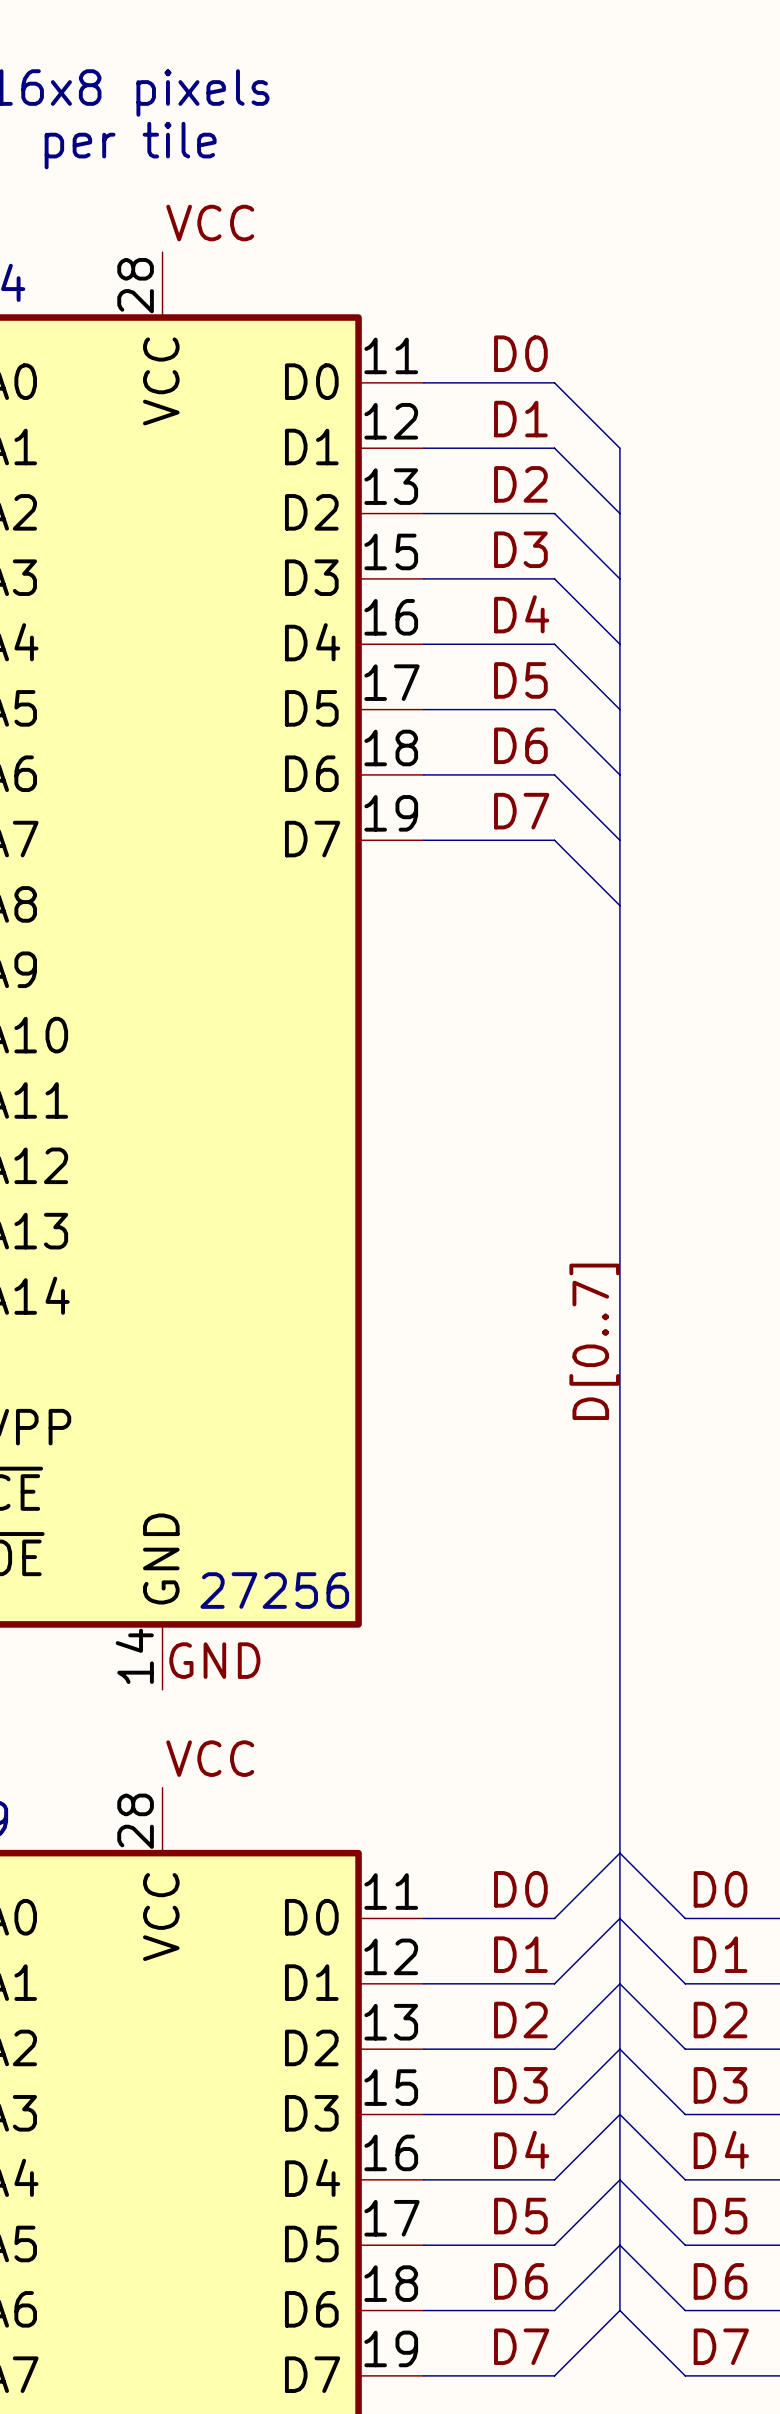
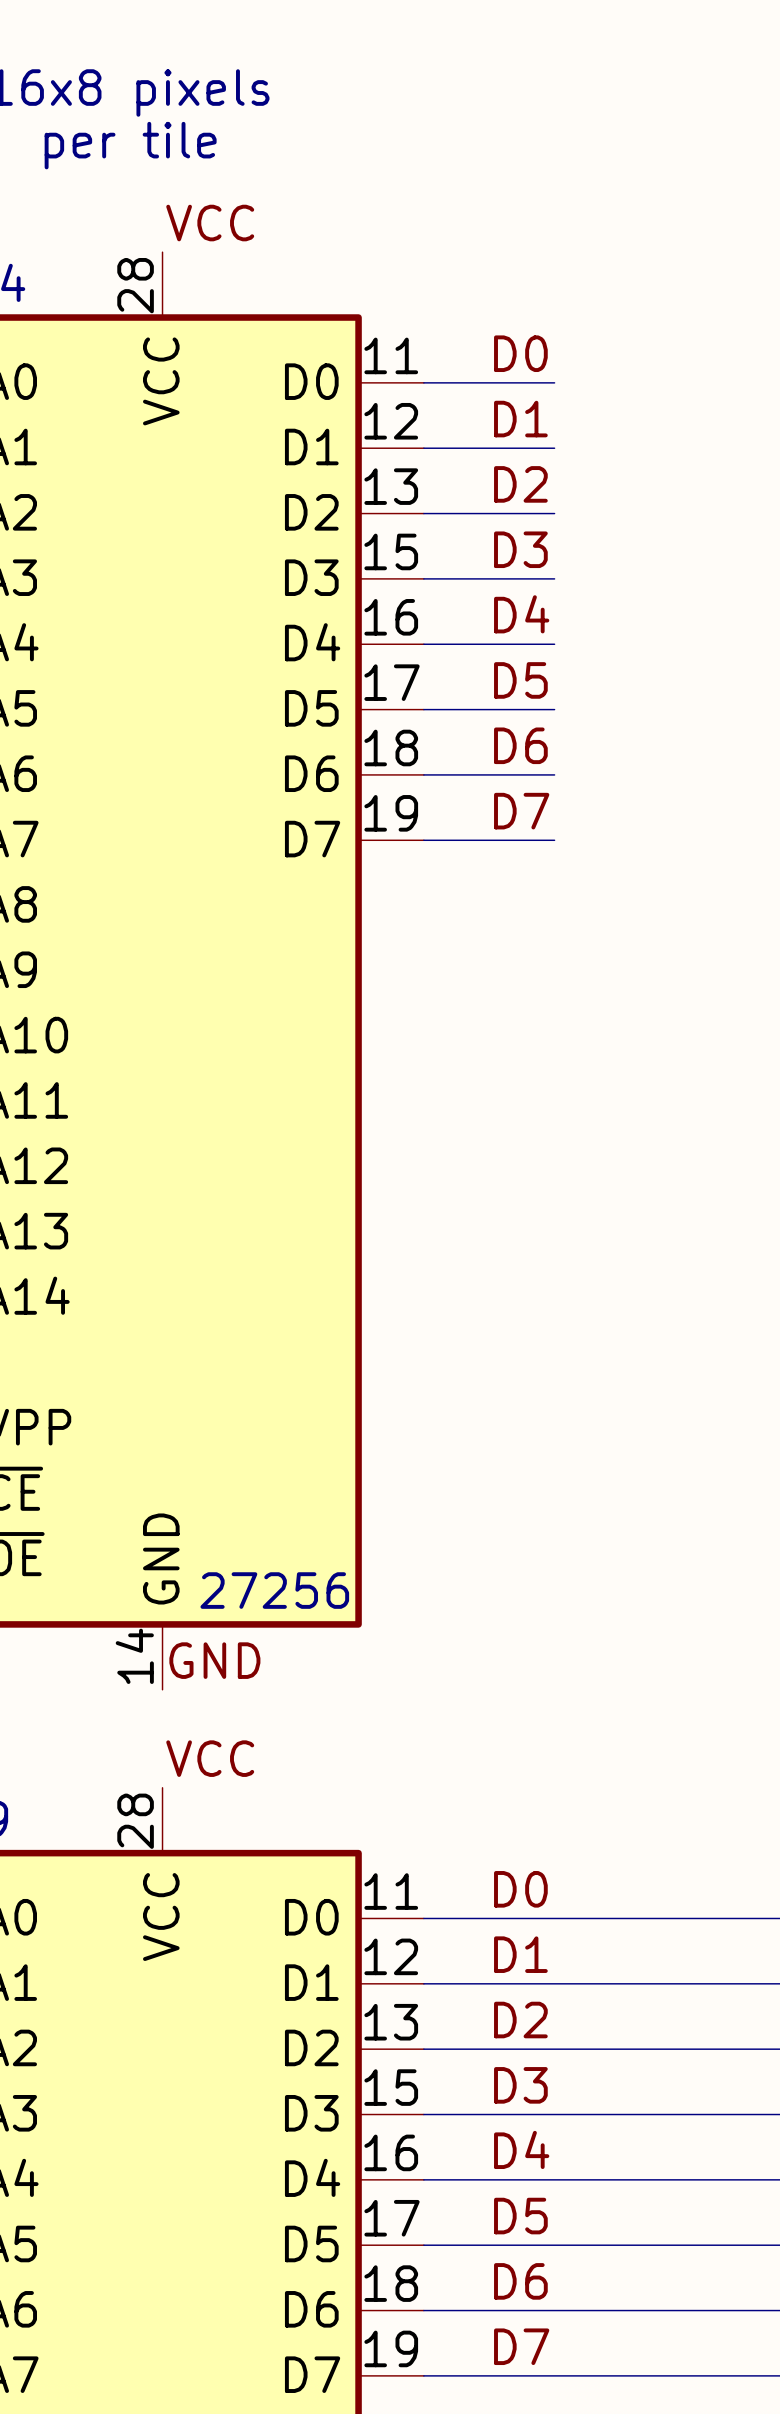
wire: (554, 382) (619, 448) -> none
wire: (554, 448) (619, 513) -> none
bus: (619, 448) (619, 2310) -> none
wire: (554, 513) (619, 578) -> none
wire: (554, 578) (619, 644) -> none
wire: (554, 644) (619, 709) -> none
wire: (554, 709) (619, 774) -> none
wire: (554, 774) (619, 840) -> none
wire: (554, 840) (619, 905) -> none
label: D[0..7] (594, 1341) -> none
label: D0 (720, 1889) -> none
wire: (554, 1918) (619, 1853) (685, 1918) -> (554, 1918) (685, 1918)
label: D1 (720, 1954) -> none
wire: (554, 1983) (619, 1918) (685, 1983) -> (554, 1983) (685, 1983)
label: D2 (720, 2020) -> none
wire: (554, 2049) (619, 1983) (685, 2049) -> (554, 2049) (685, 2049)
label: D3 (720, 2085) -> none
wire: (554, 2114) (619, 2049) (685, 2114) -> (554, 2114) (685, 2114)
label: D4 (721, 2149) -> none
wire: (554, 2179) (619, 2114) (685, 2179) -> (554, 2179) (685, 2179)
label: D5 (720, 2216) -> none
wire: (554, 2245) (619, 2179) (685, 2245) -> (554, 2245) (685, 2245)
label: D6 (720, 2281) -> none
wire: (554, 2310) (619, 2245) (685, 2310) -> (554, 2310) (685, 2310)
label: D7 (721, 2346) -> none
wire: (554, 2375) (619, 2310) (685, 2375) -> (554, 2375) (685, 2375)

